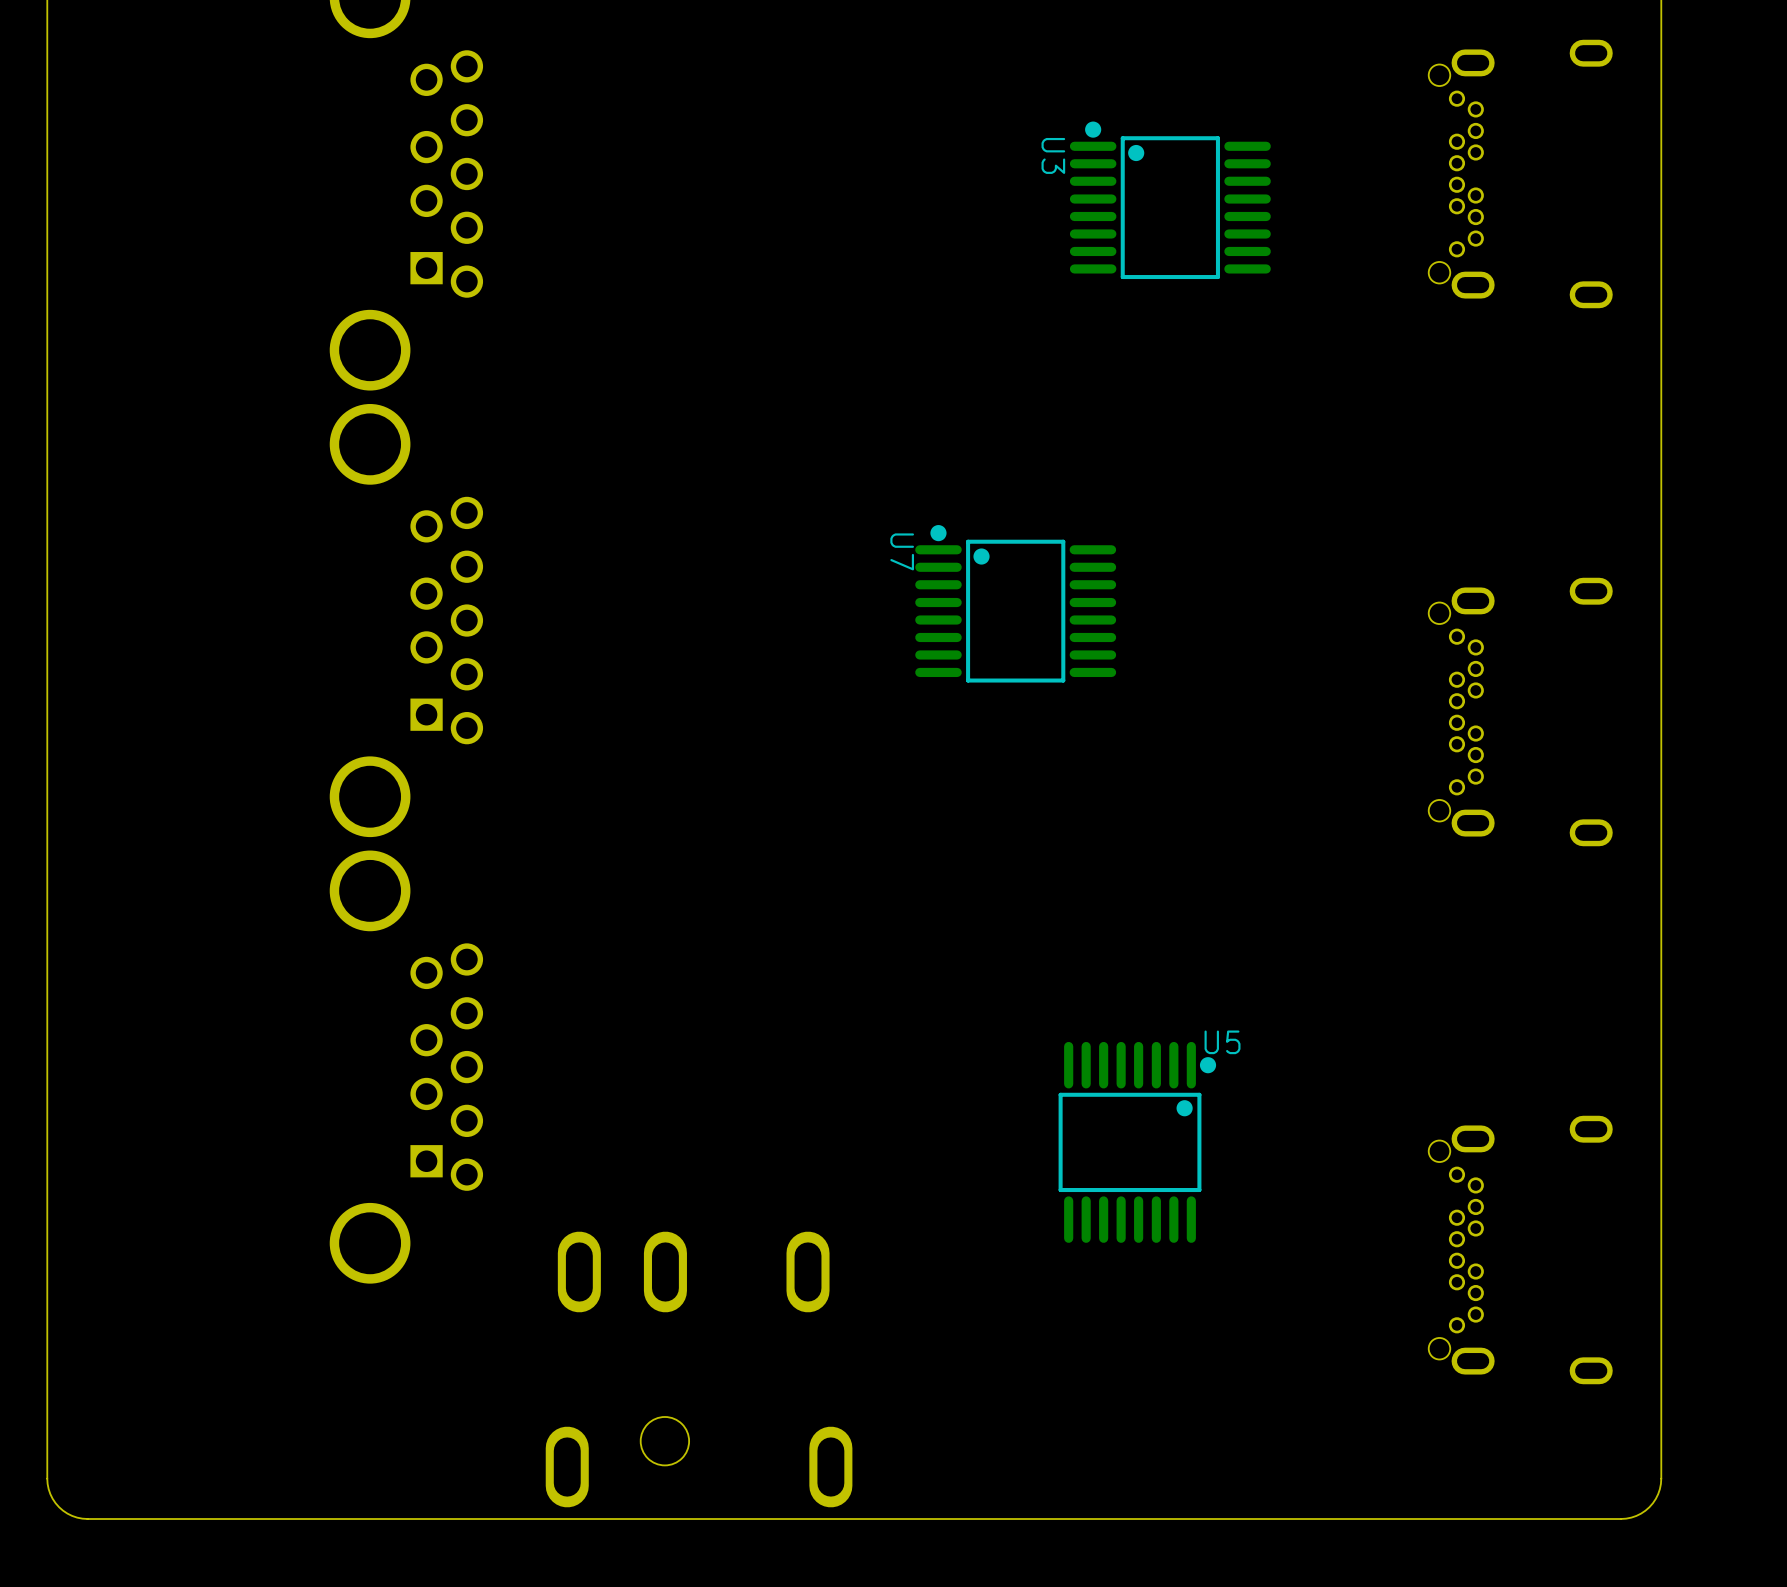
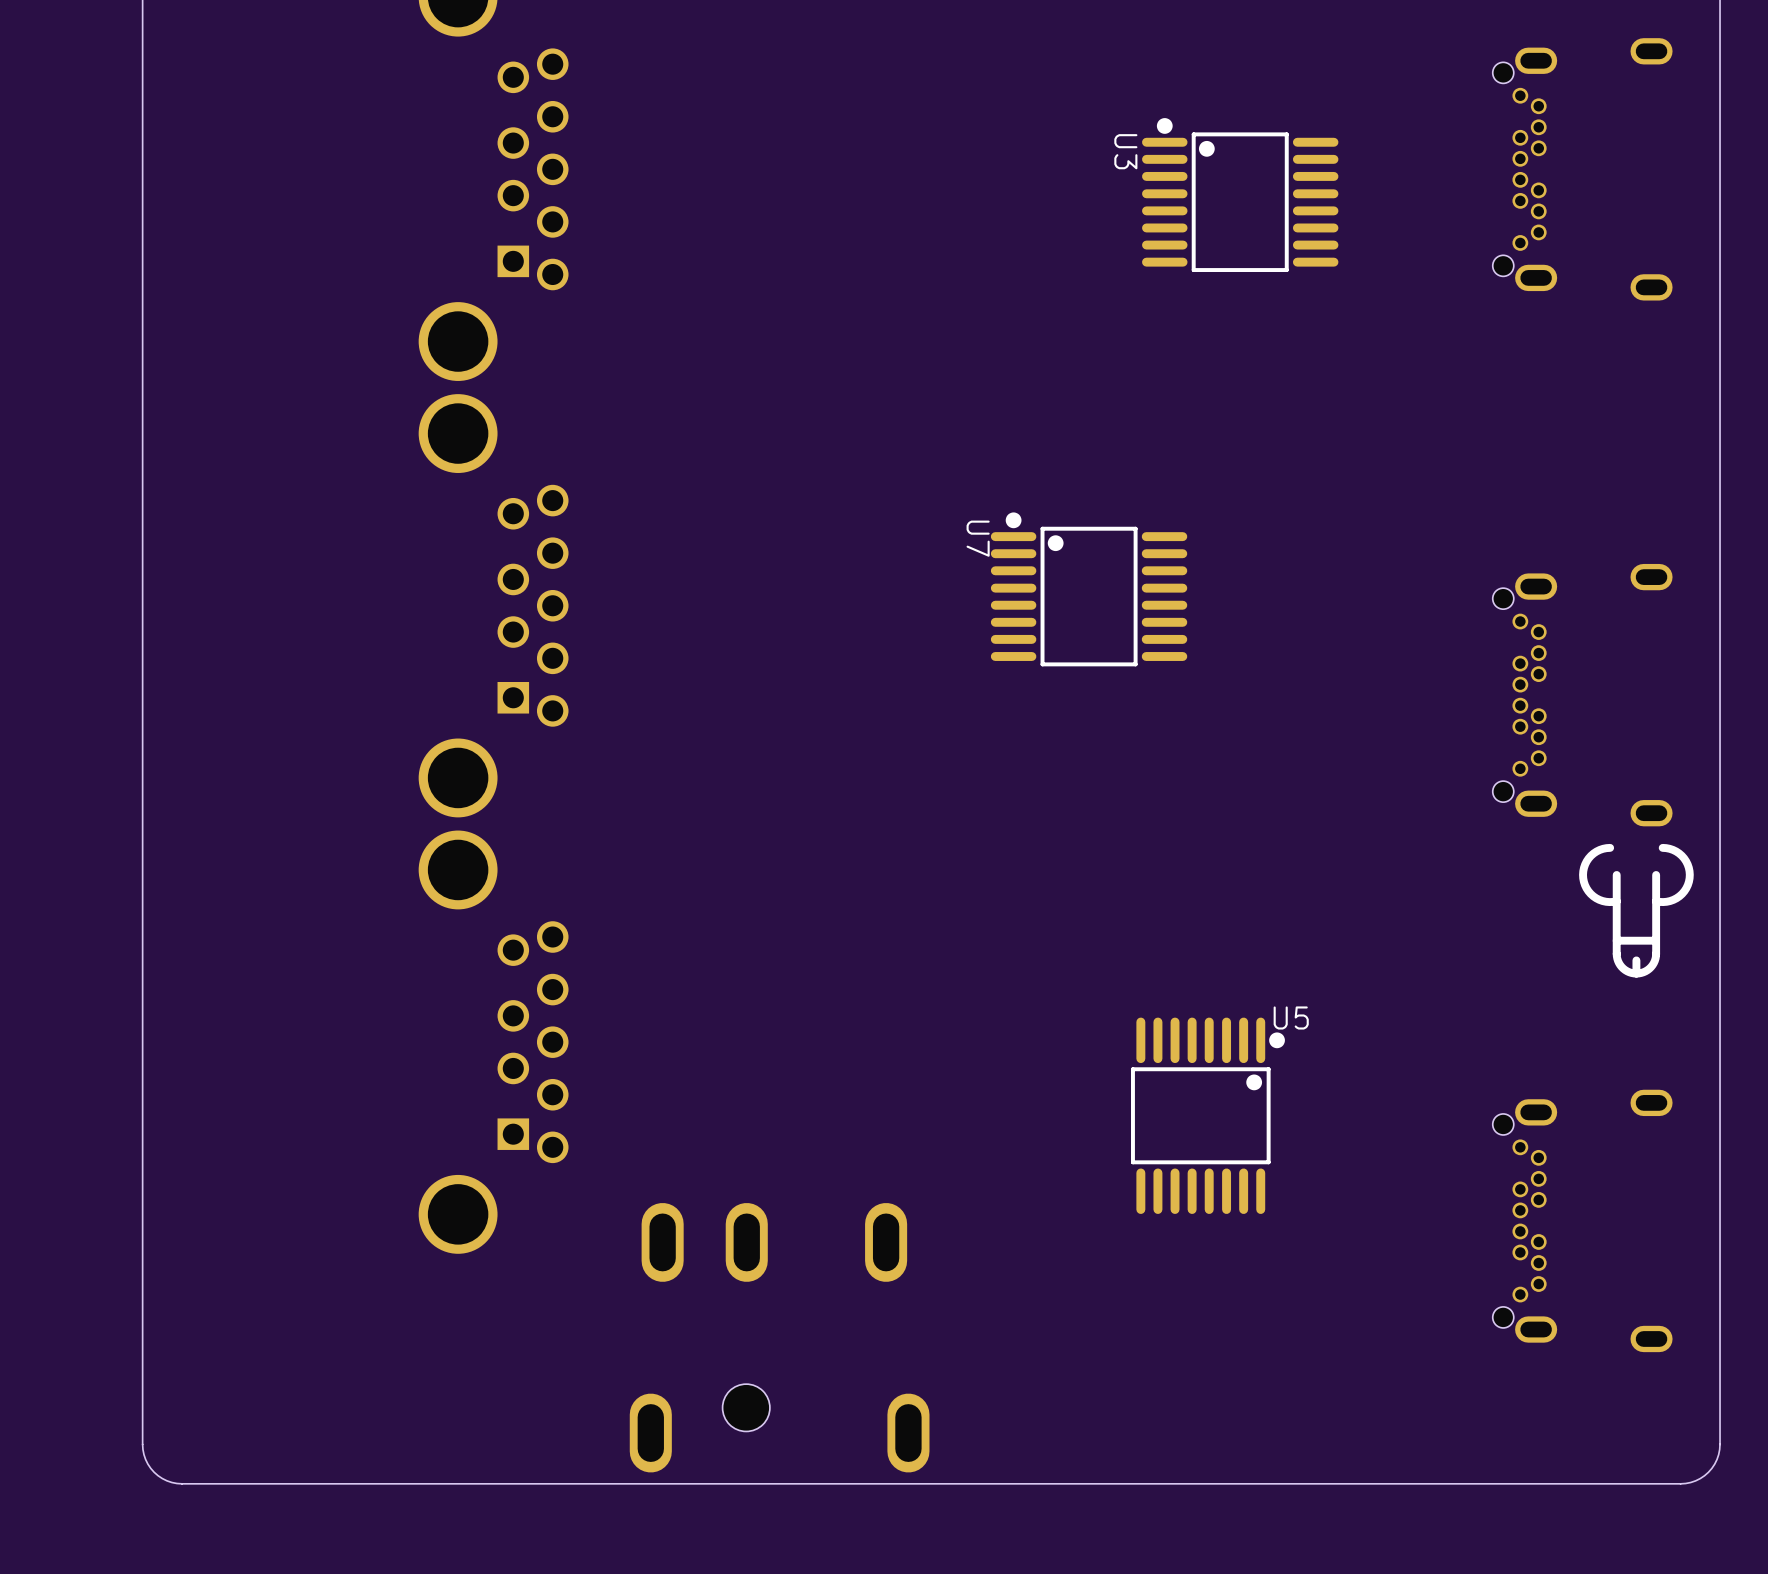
line: none -> (1610, 847) (1596, 851) (1588, 858) (1584, 867) (1583, 878) (1586, 888) (1593, 896) (1602, 901) (1616, 901)
line: none -> (1662, 847) (1676, 851) (1684, 858) (1688, 867) (1689, 878) (1684, 891) (1676, 898) (1666, 901) (1656, 901)
line: none -> (1656, 874) (1655, 958) (1649, 968) (1636, 973) (1625, 970) (1617, 958) (1616, 874)
line: none -> (1656, 940) (1616, 940)
line: none -> (1636, 960) (1636, 973)

